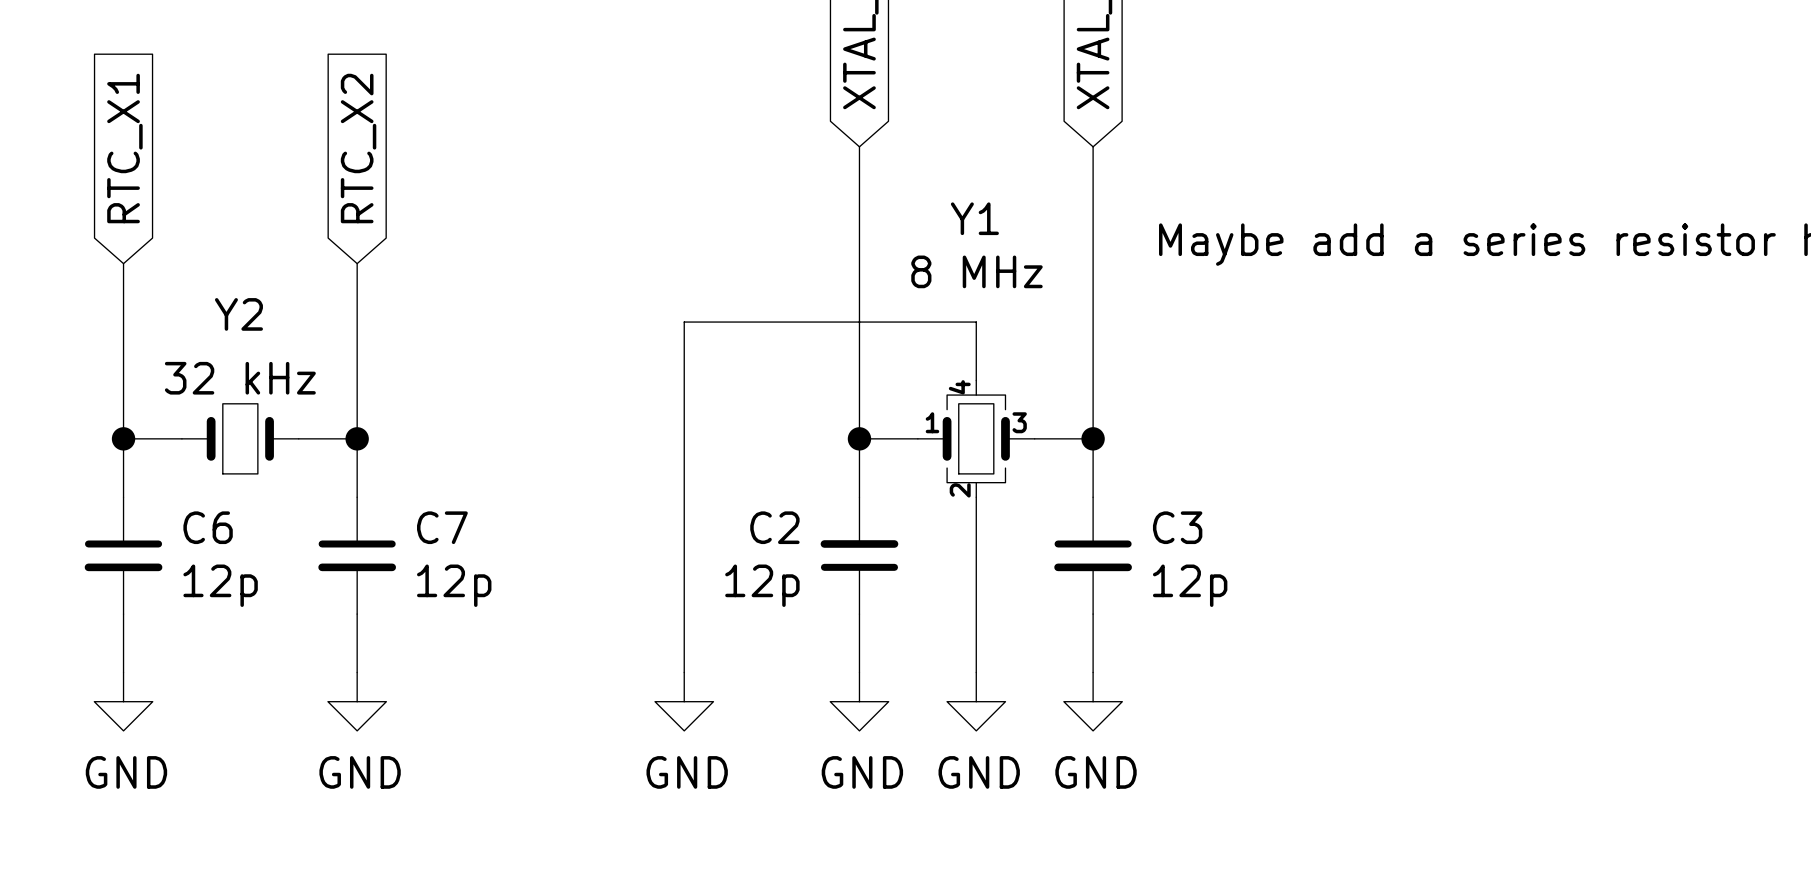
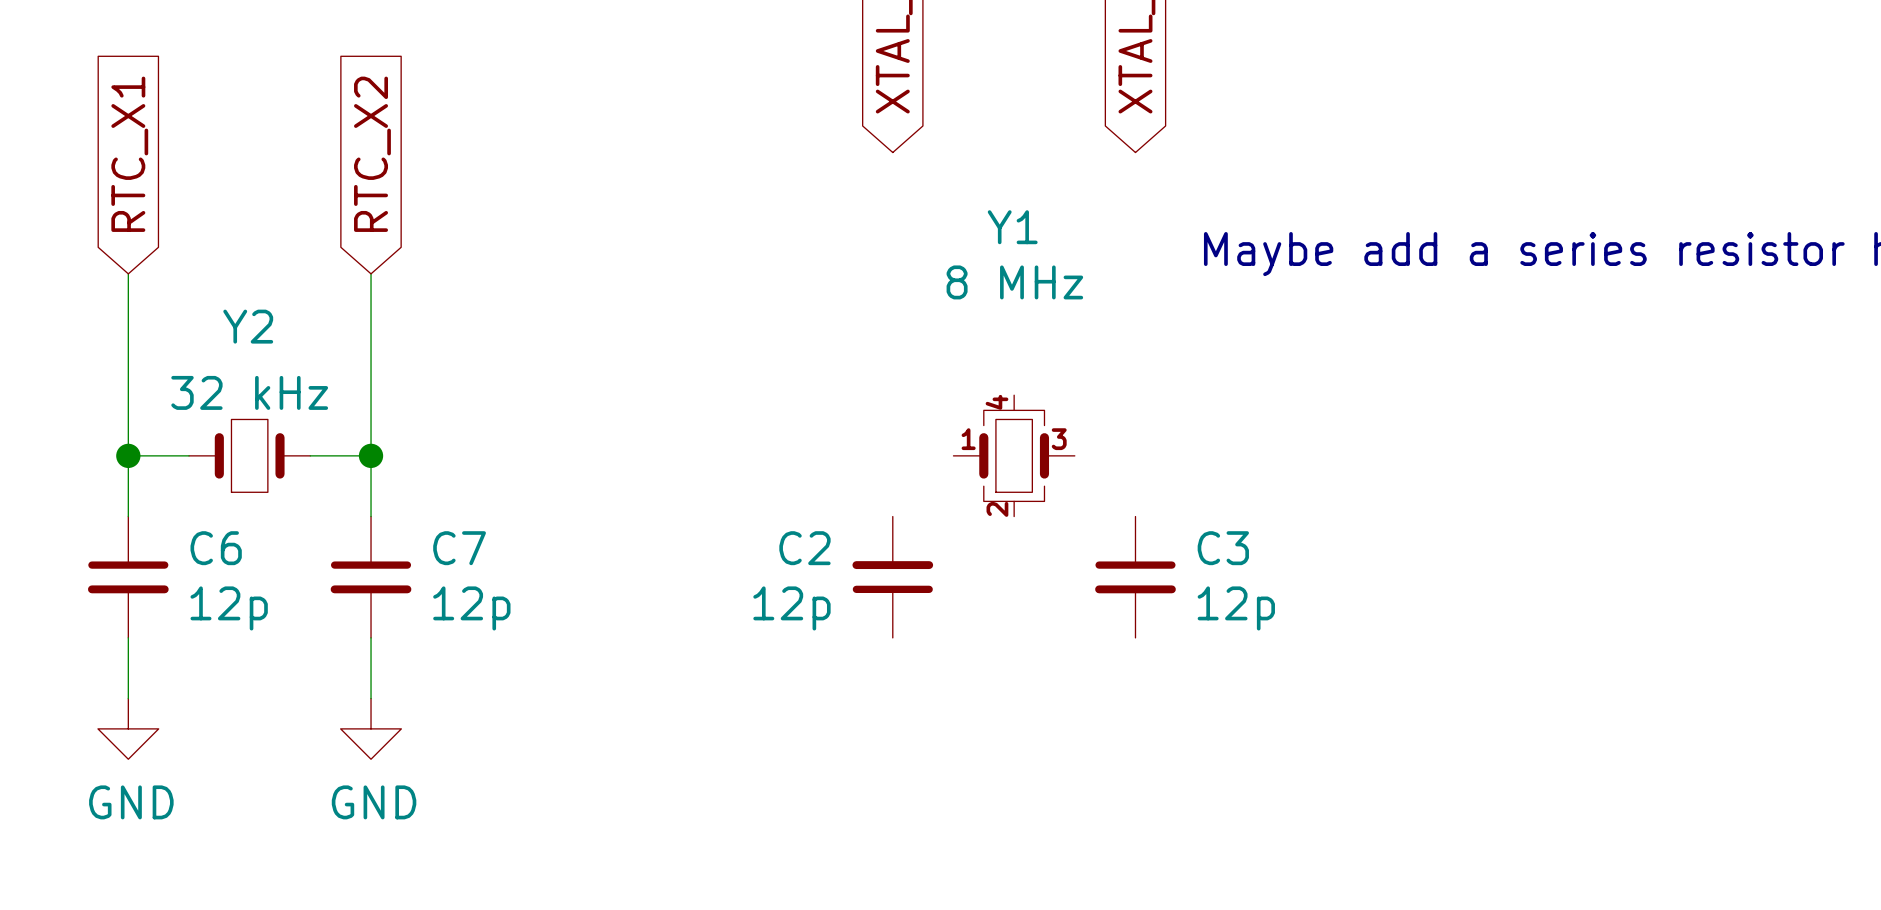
wire: (859, 146) (859, 497) -> none
wire: (1093, 146) (1093, 497) -> none
wire: (976, 380) (976, 322) (684, 322) (684, 672) -> none
wire: (859, 438) (917, 438) -> none
junction: (859, 438) -> none
wire: (1034, 438) (1093, 438) -> none
junction: (1093, 438) -> none
wire: (976, 497) (976, 672) -> none
wire: (859, 614) (859, 672) -> none
wire: (1093, 614) (1093, 672) -> none
power symbol: GND (684, 701) -> none
power symbol: GND (859, 701) -> none
power symbol: GND (976, 701) -> none
power symbol: GND (1093, 701) -> none

